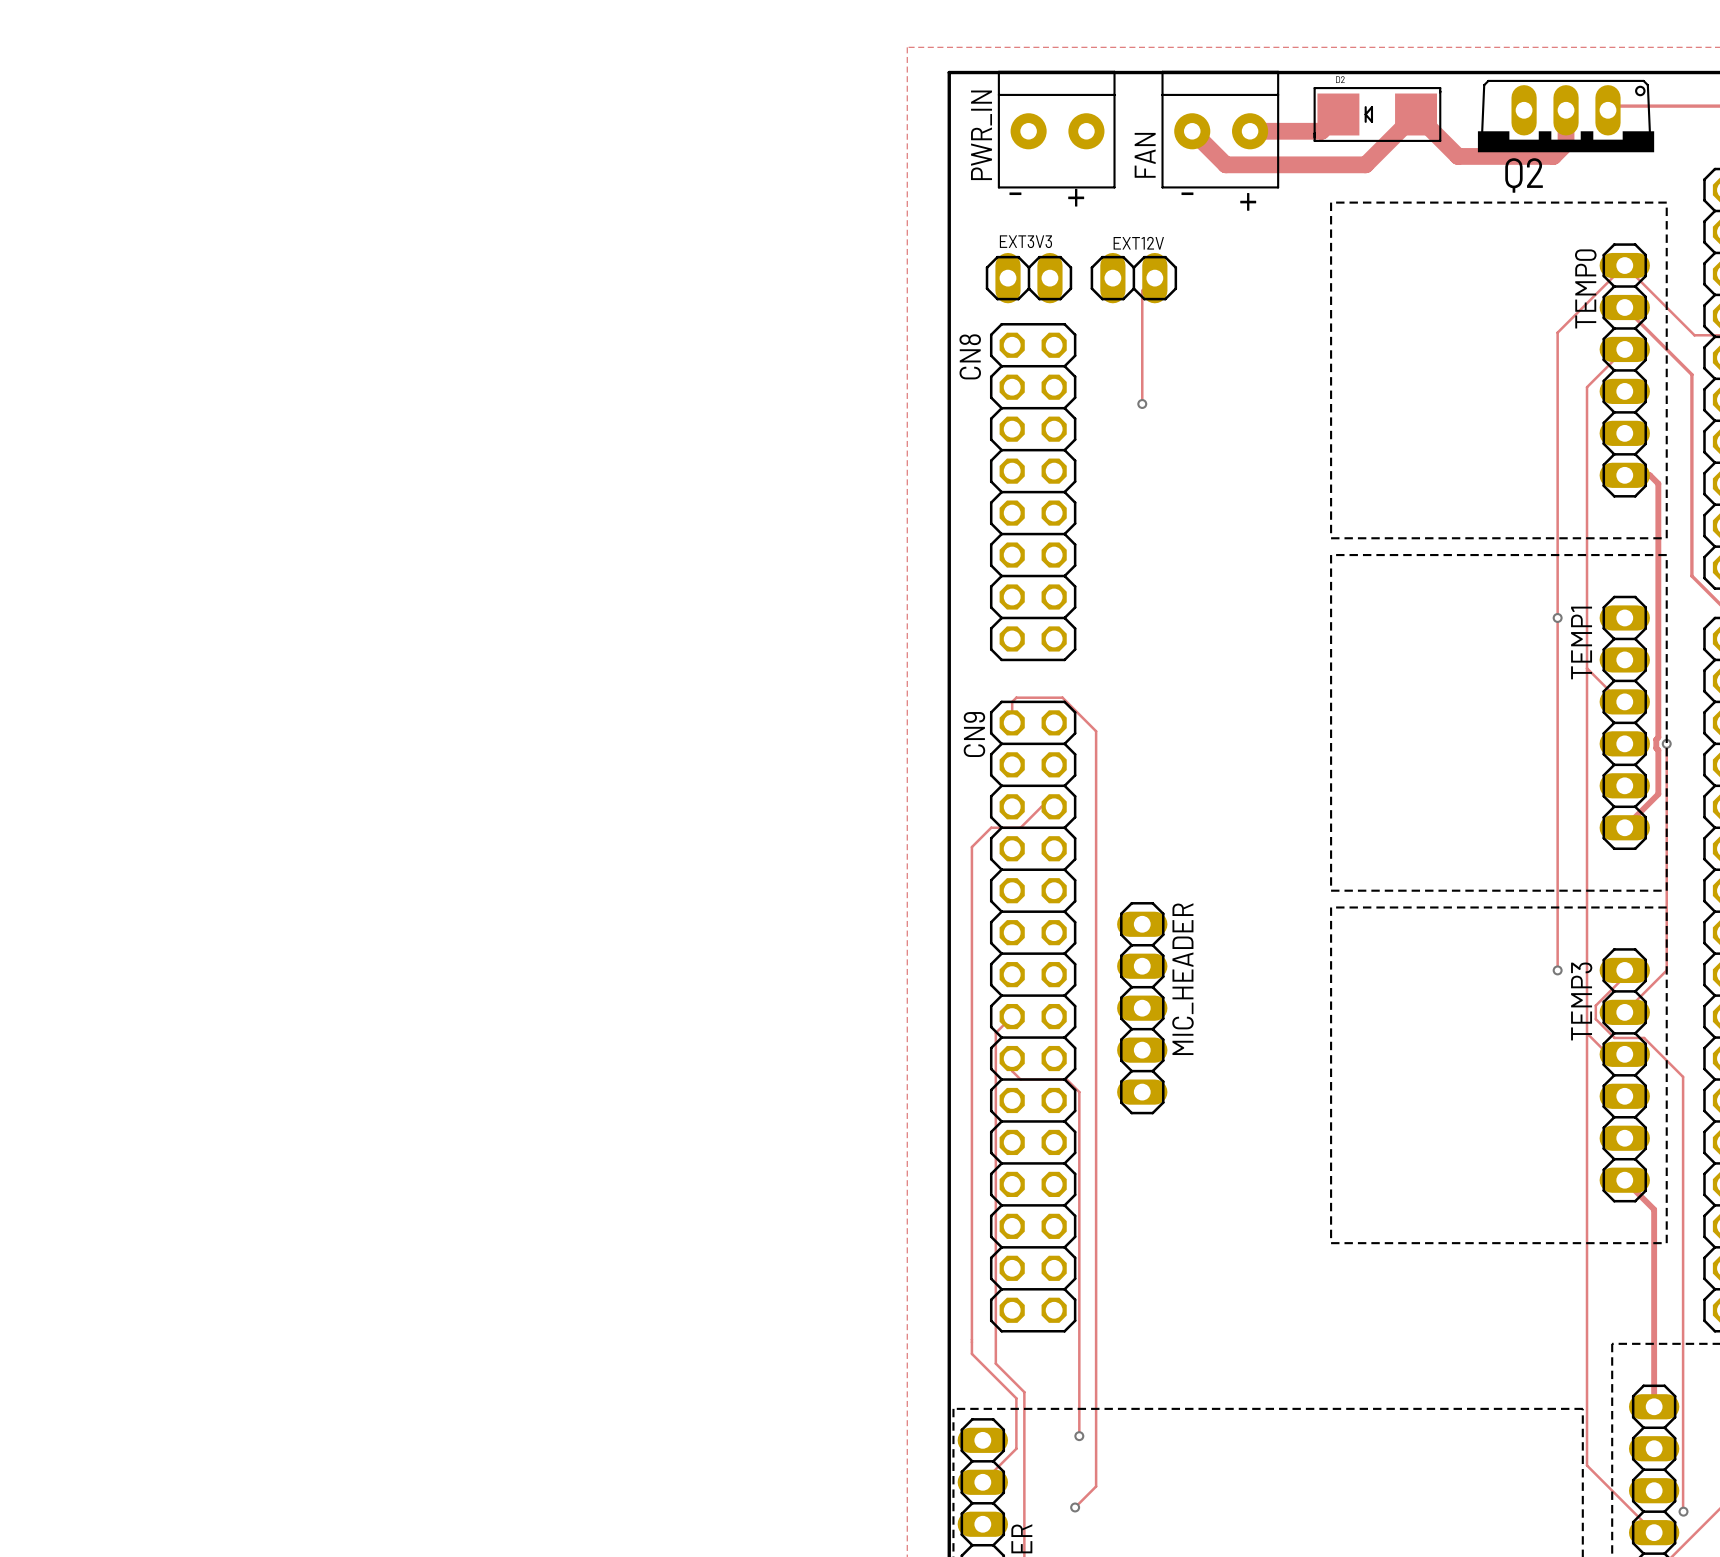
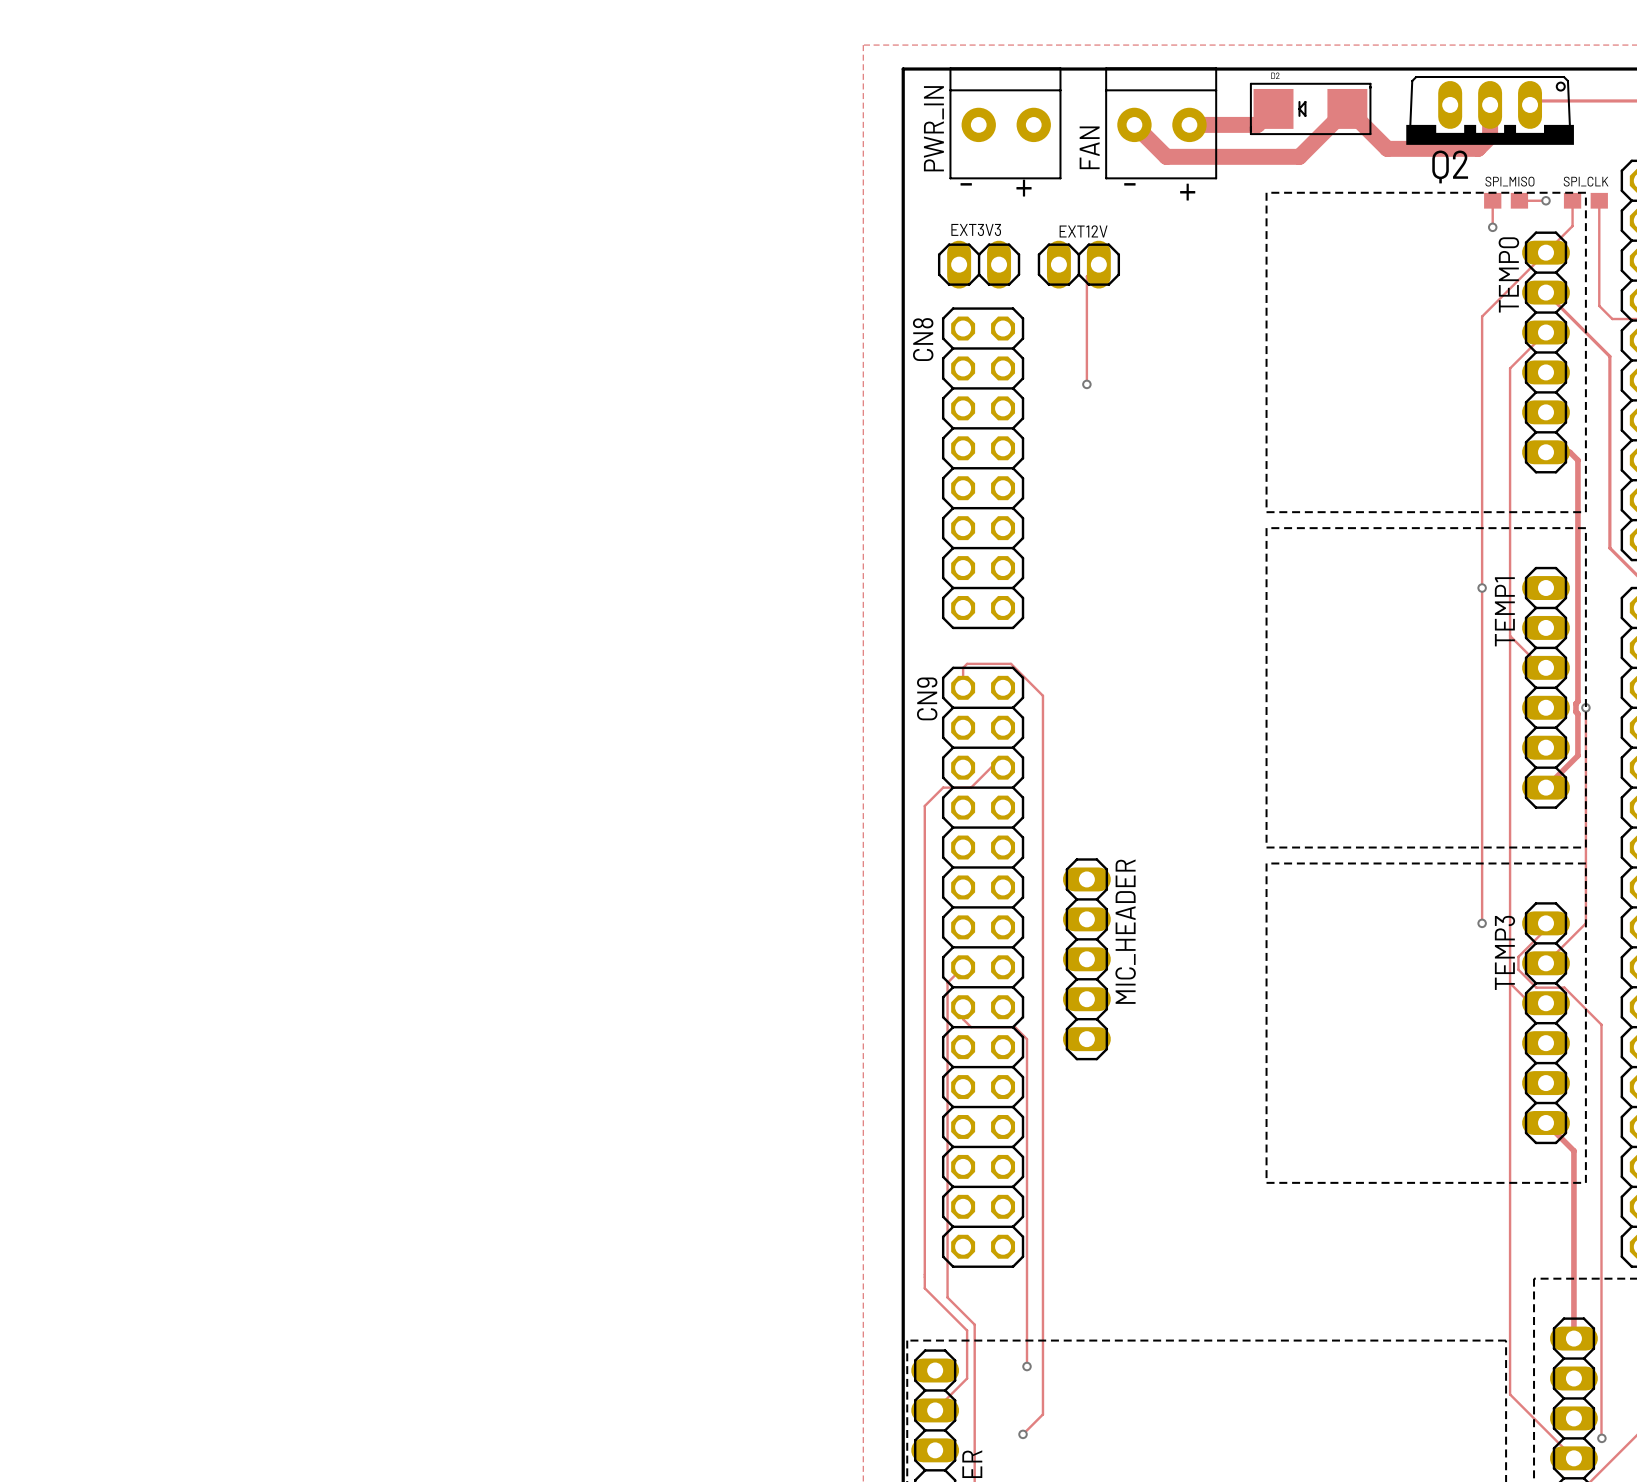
track: none -> (1492, 200) (1492, 227)
SPI_MISO: none -> (1506, 200)
track: none -> (1519, 200) (1546, 200)
via: none -> (1546, 200)
track: none -> (1572, 200) (1572, 226) (1546, 252)
SPI_CLK: none -> (1585, 200)
via: none -> (1492, 227)
track: (1624, 265) (1680, 321) -> (1599, 200) (1599, 305)

